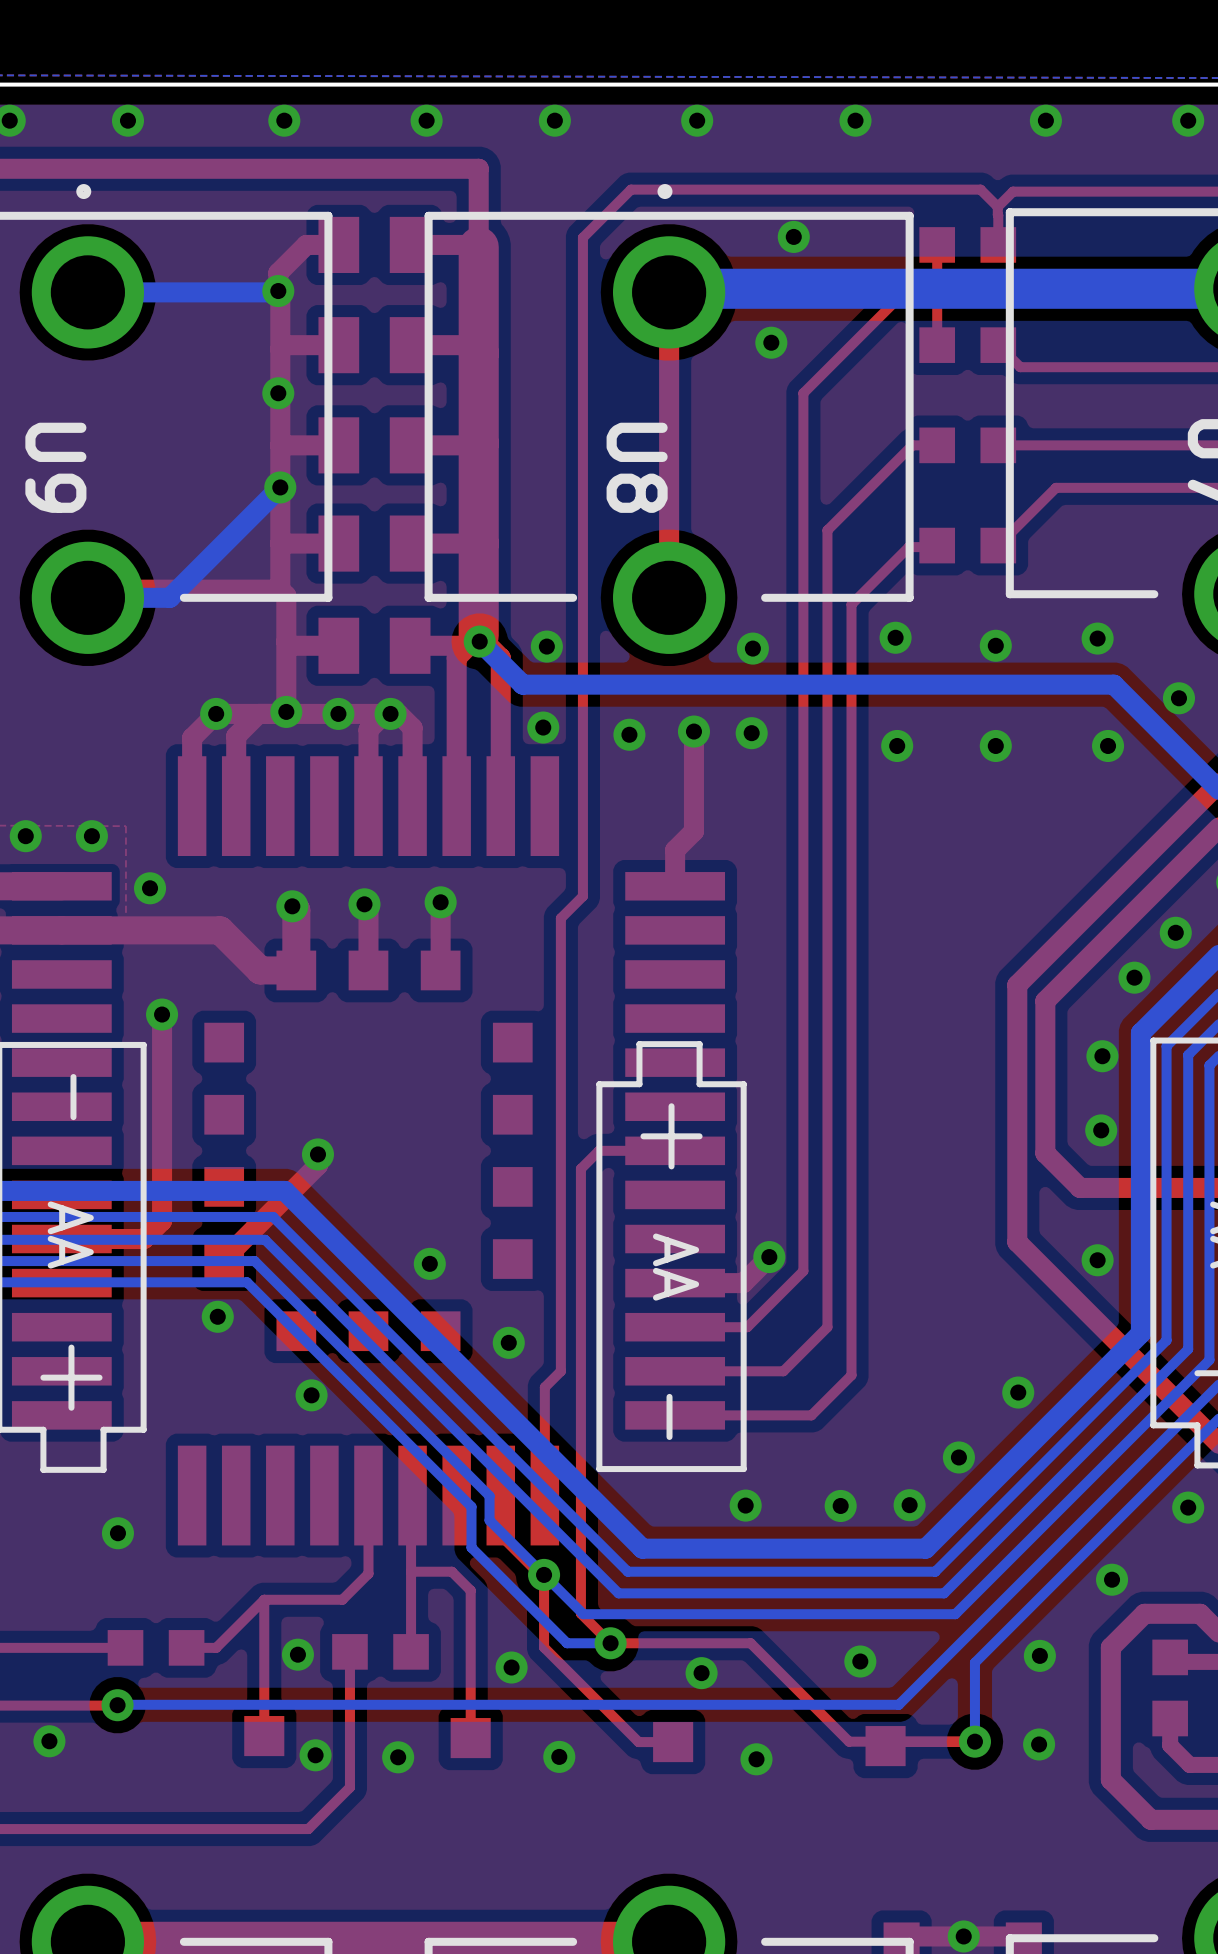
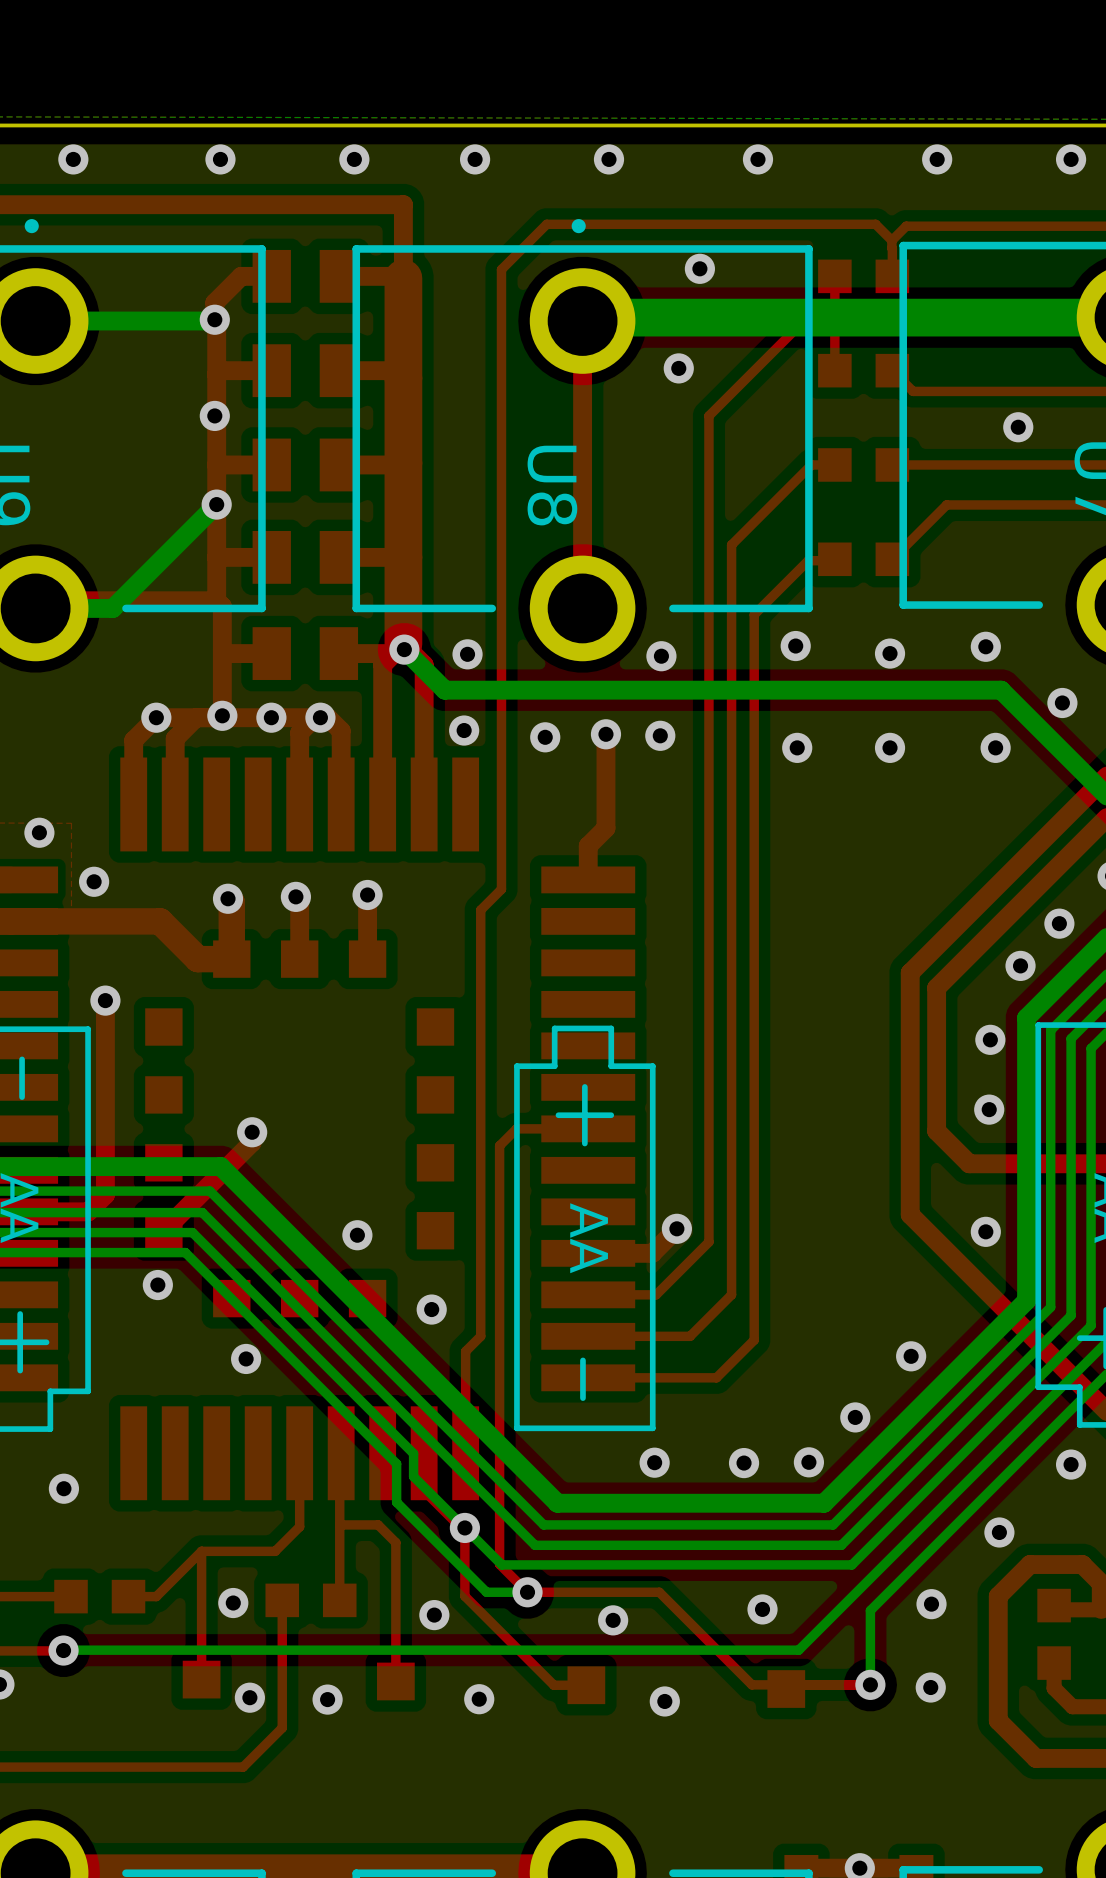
via: none -> (1018, 427)

